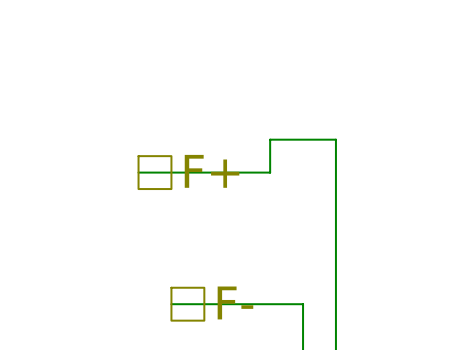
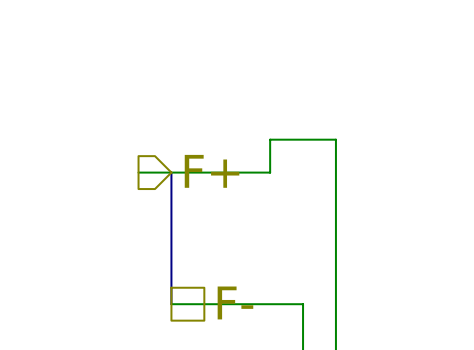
hierarchical label shape: passive (212, 171) -> output (212, 171)
bus: none -> (171, 172) (171, 304)

